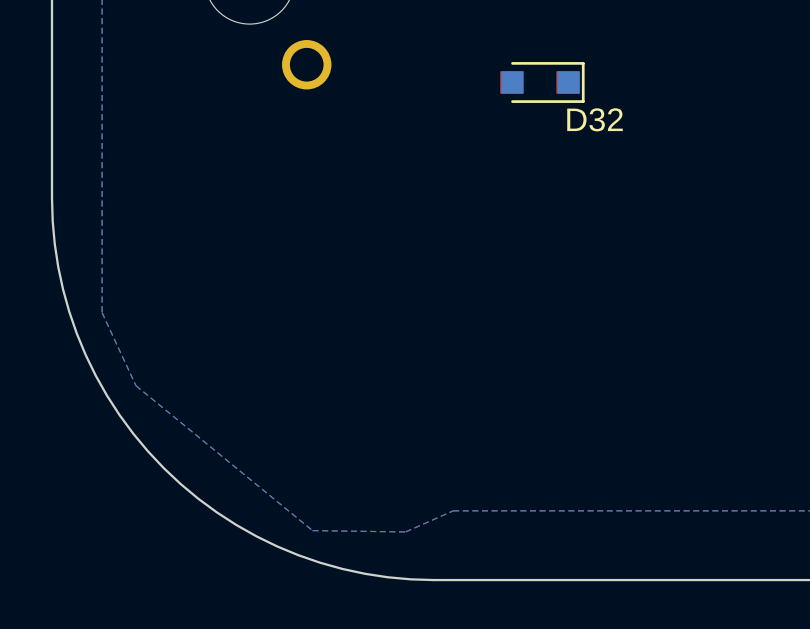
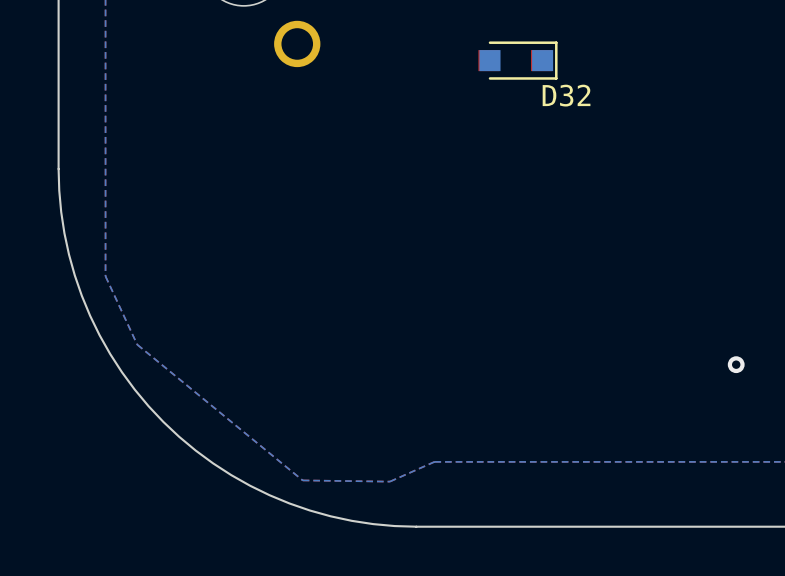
via: none -> (736, 364)

